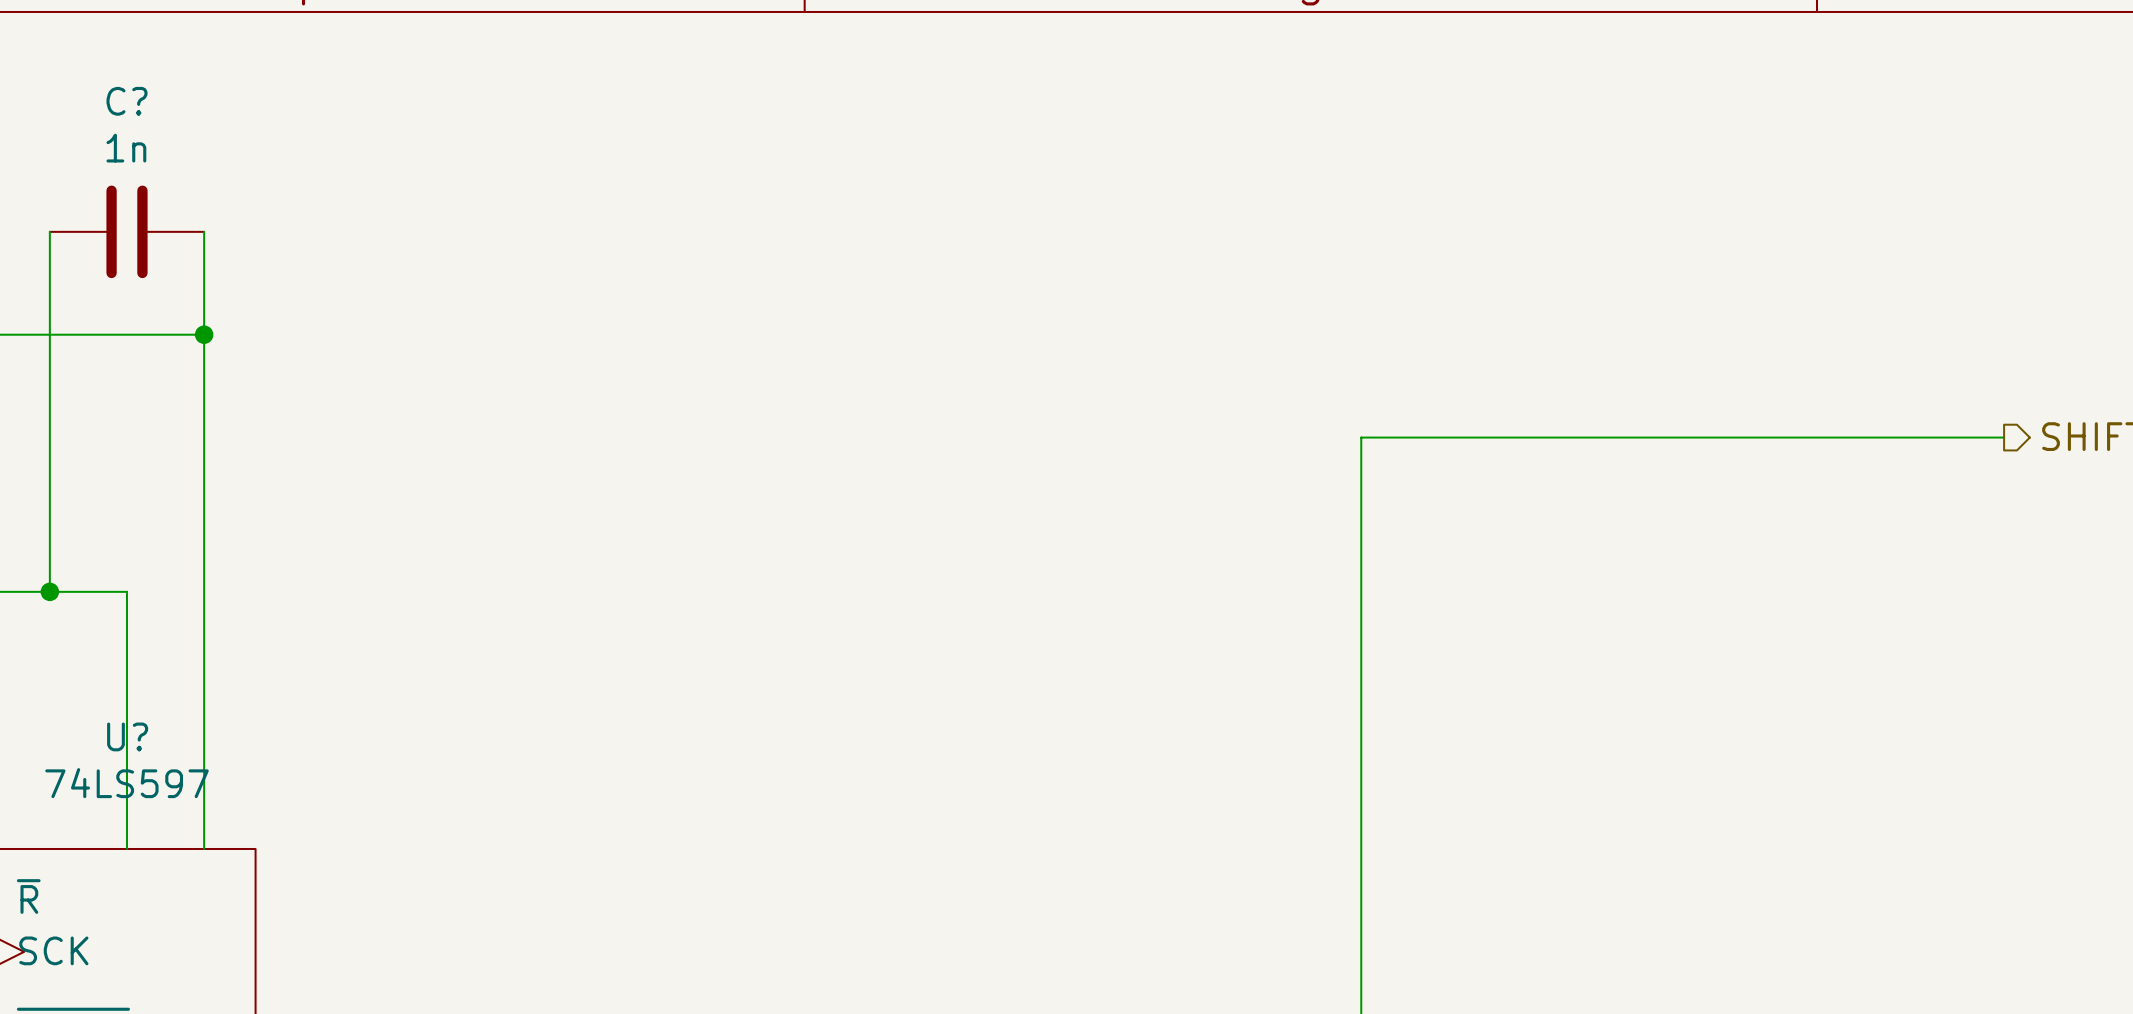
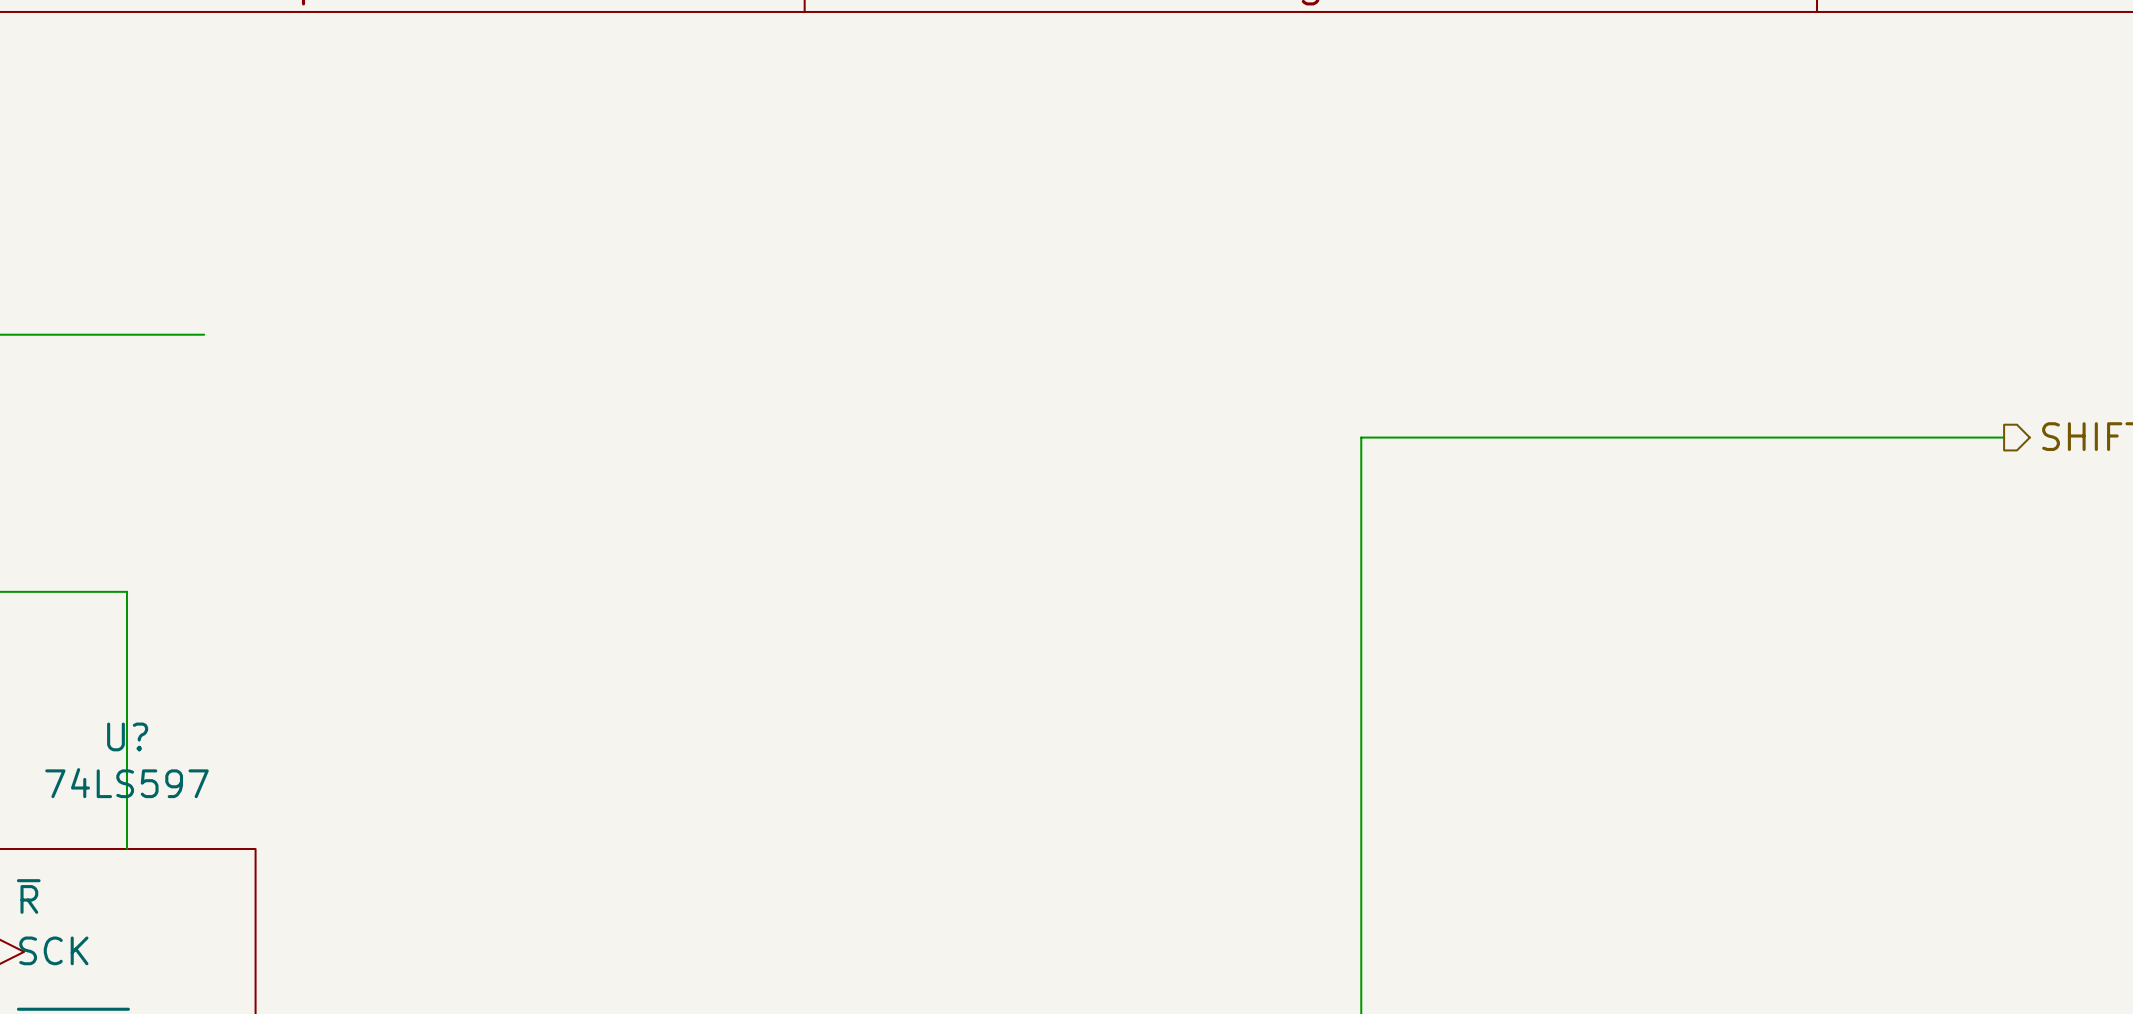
wire: (49, 231) (49, 591) -> none
C?: 1n (127, 231) -> none
wire: (204, 231) (204, 848) -> none
junction: (204, 334) -> none
junction: (49, 591) -> none

